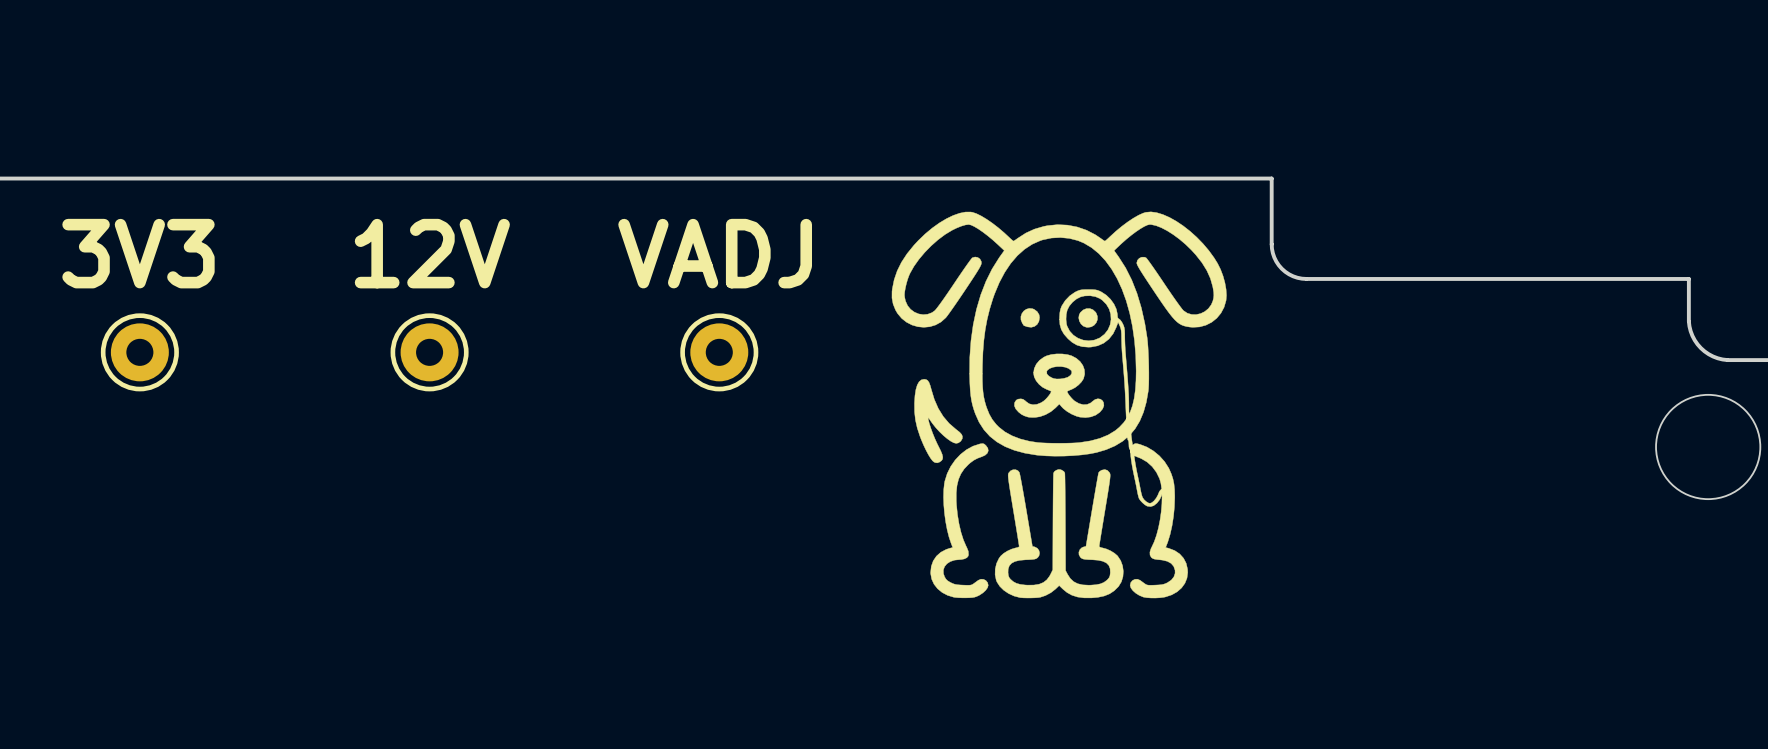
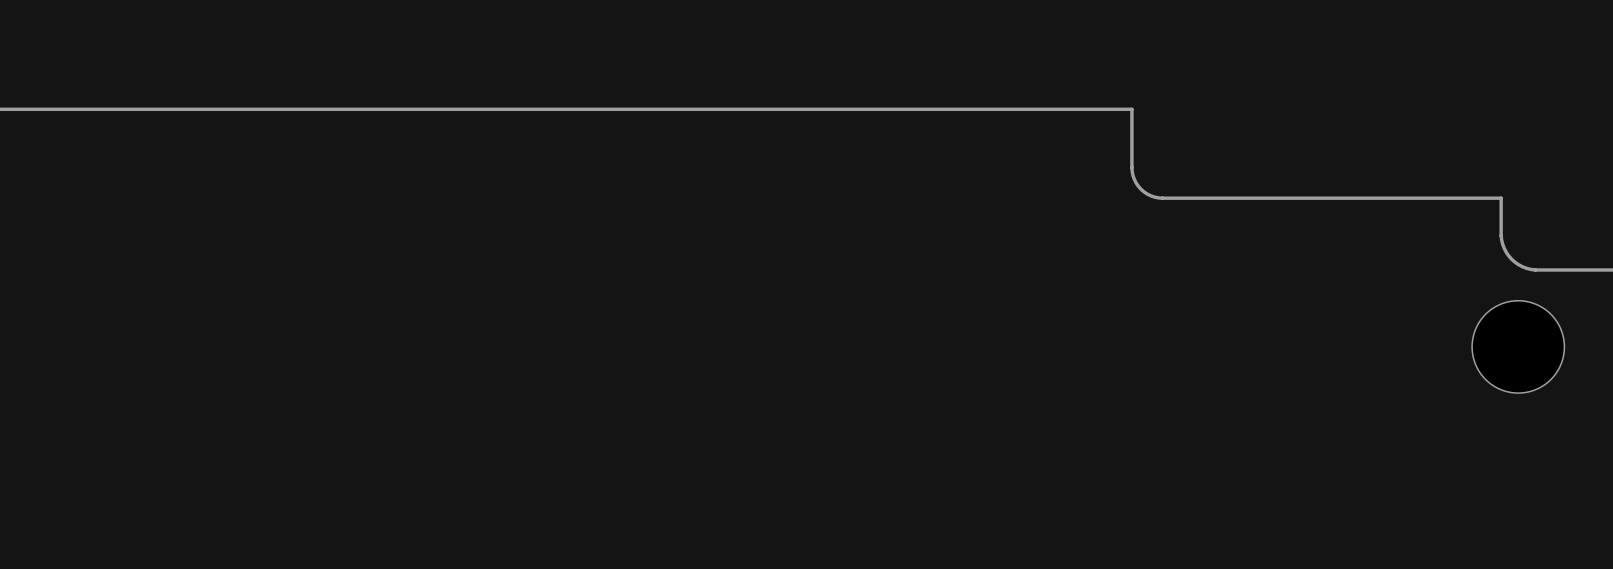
drawing: [891, 211, 1227, 599] -> none
text: 3V3 (138, 253) -> none
text: 12V (432, 253) -> none
text: VADJ (715, 253) -> none
part: (139, 352) -> none
part: (429, 352) -> none
part: (719, 352) -> none

